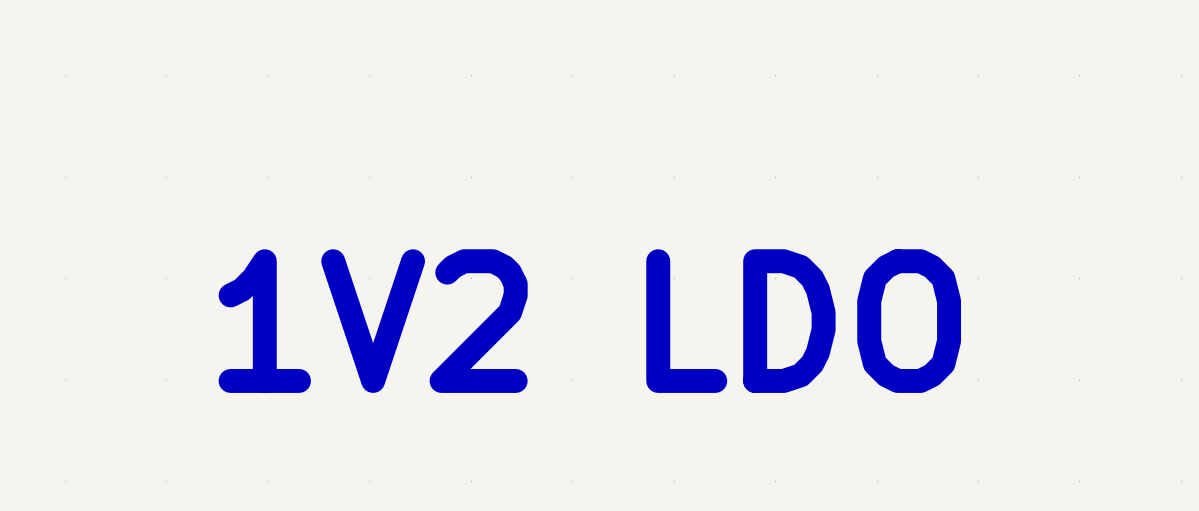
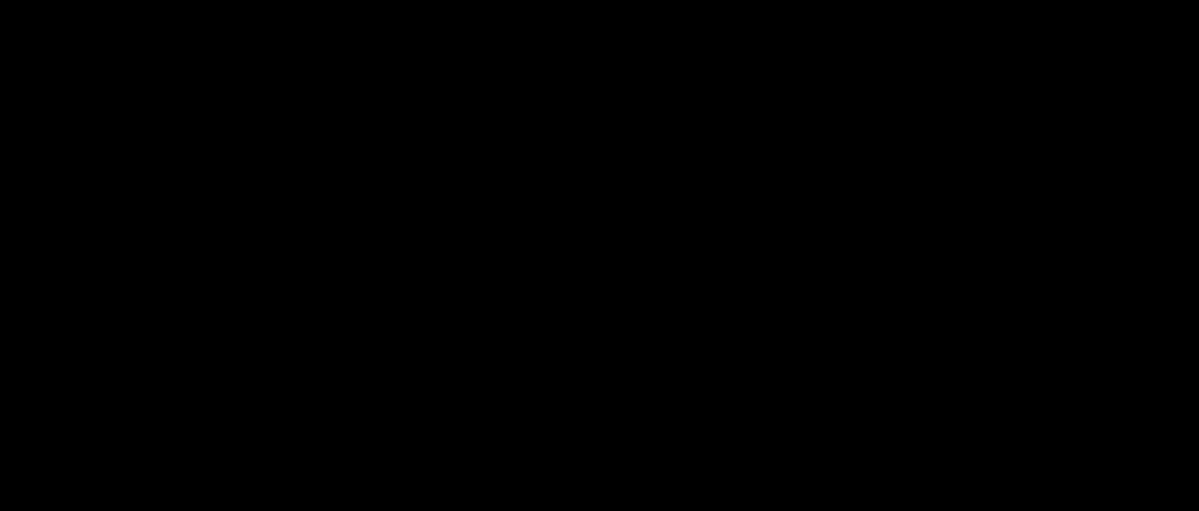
text: 1V2 LDO (589, 321) -> none

